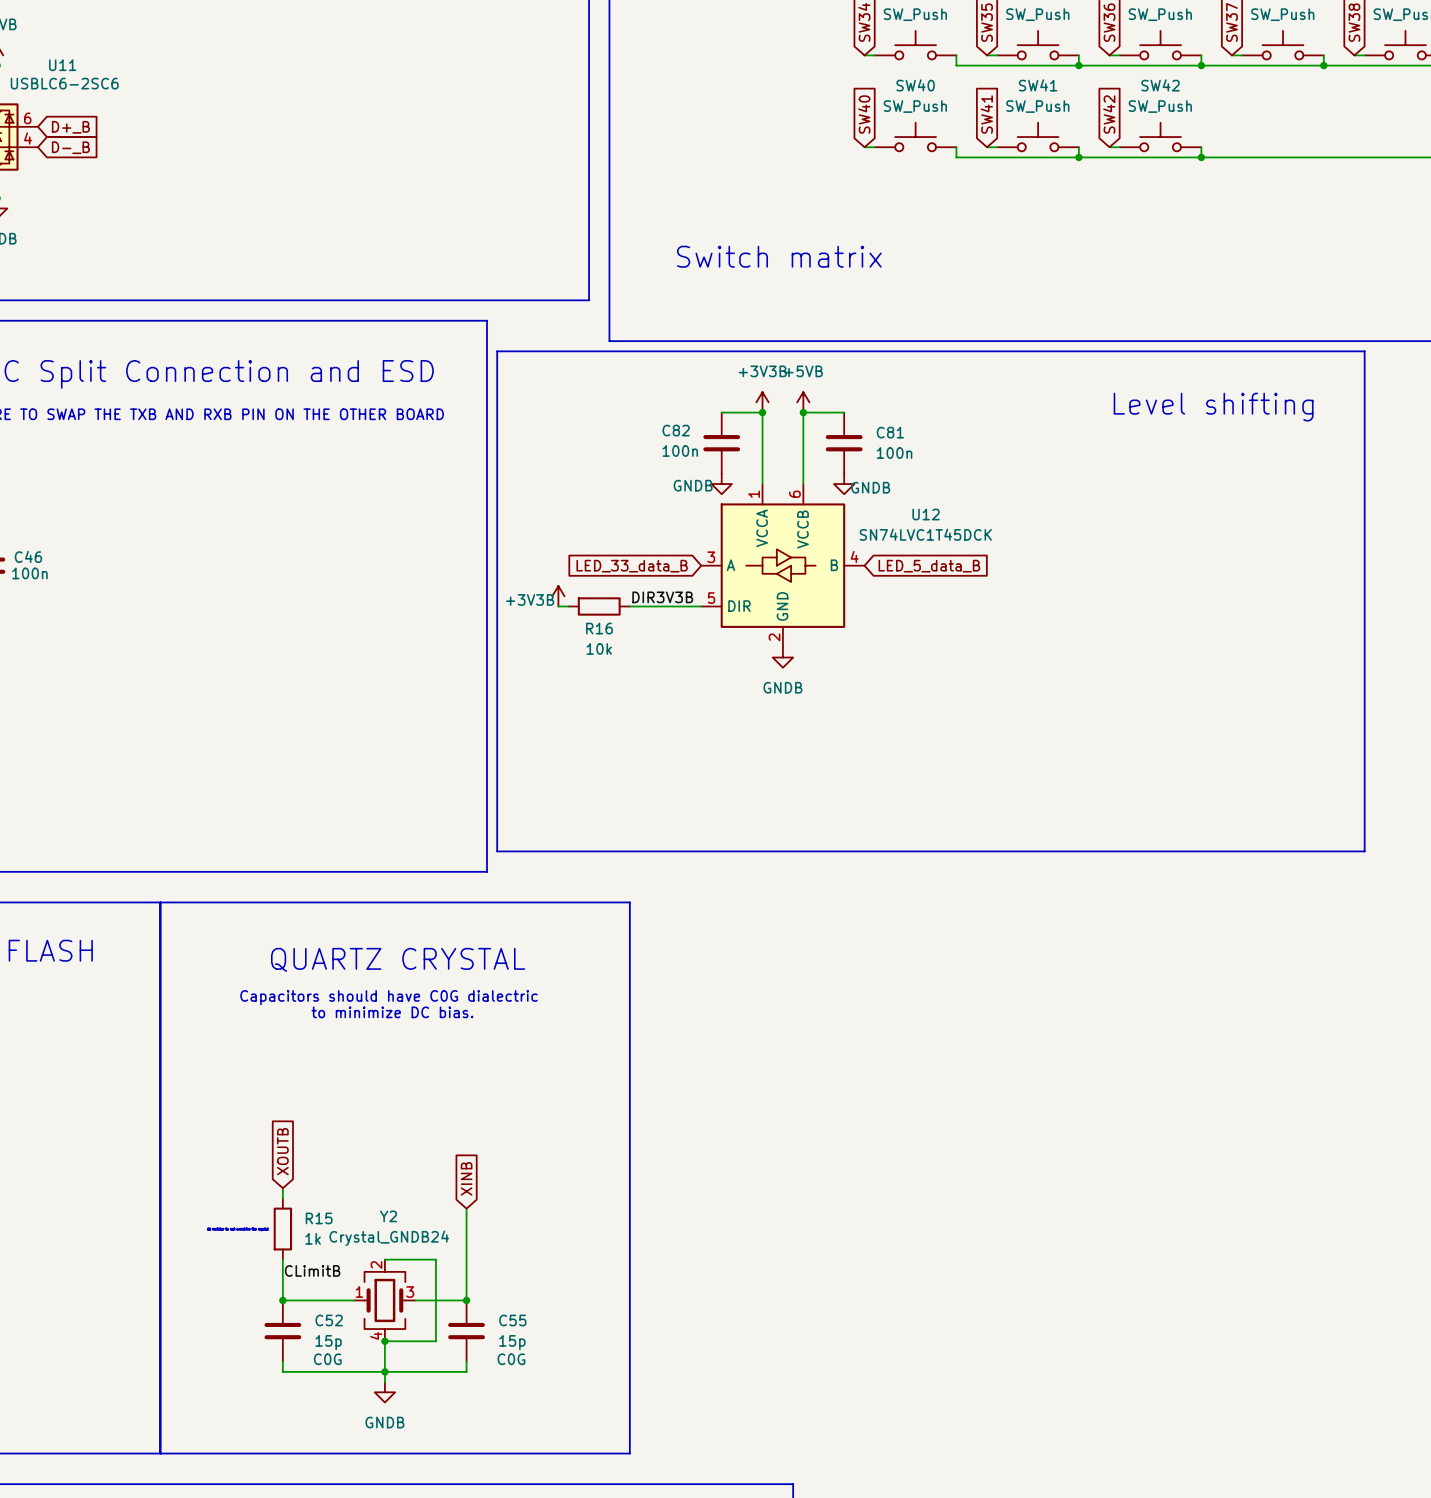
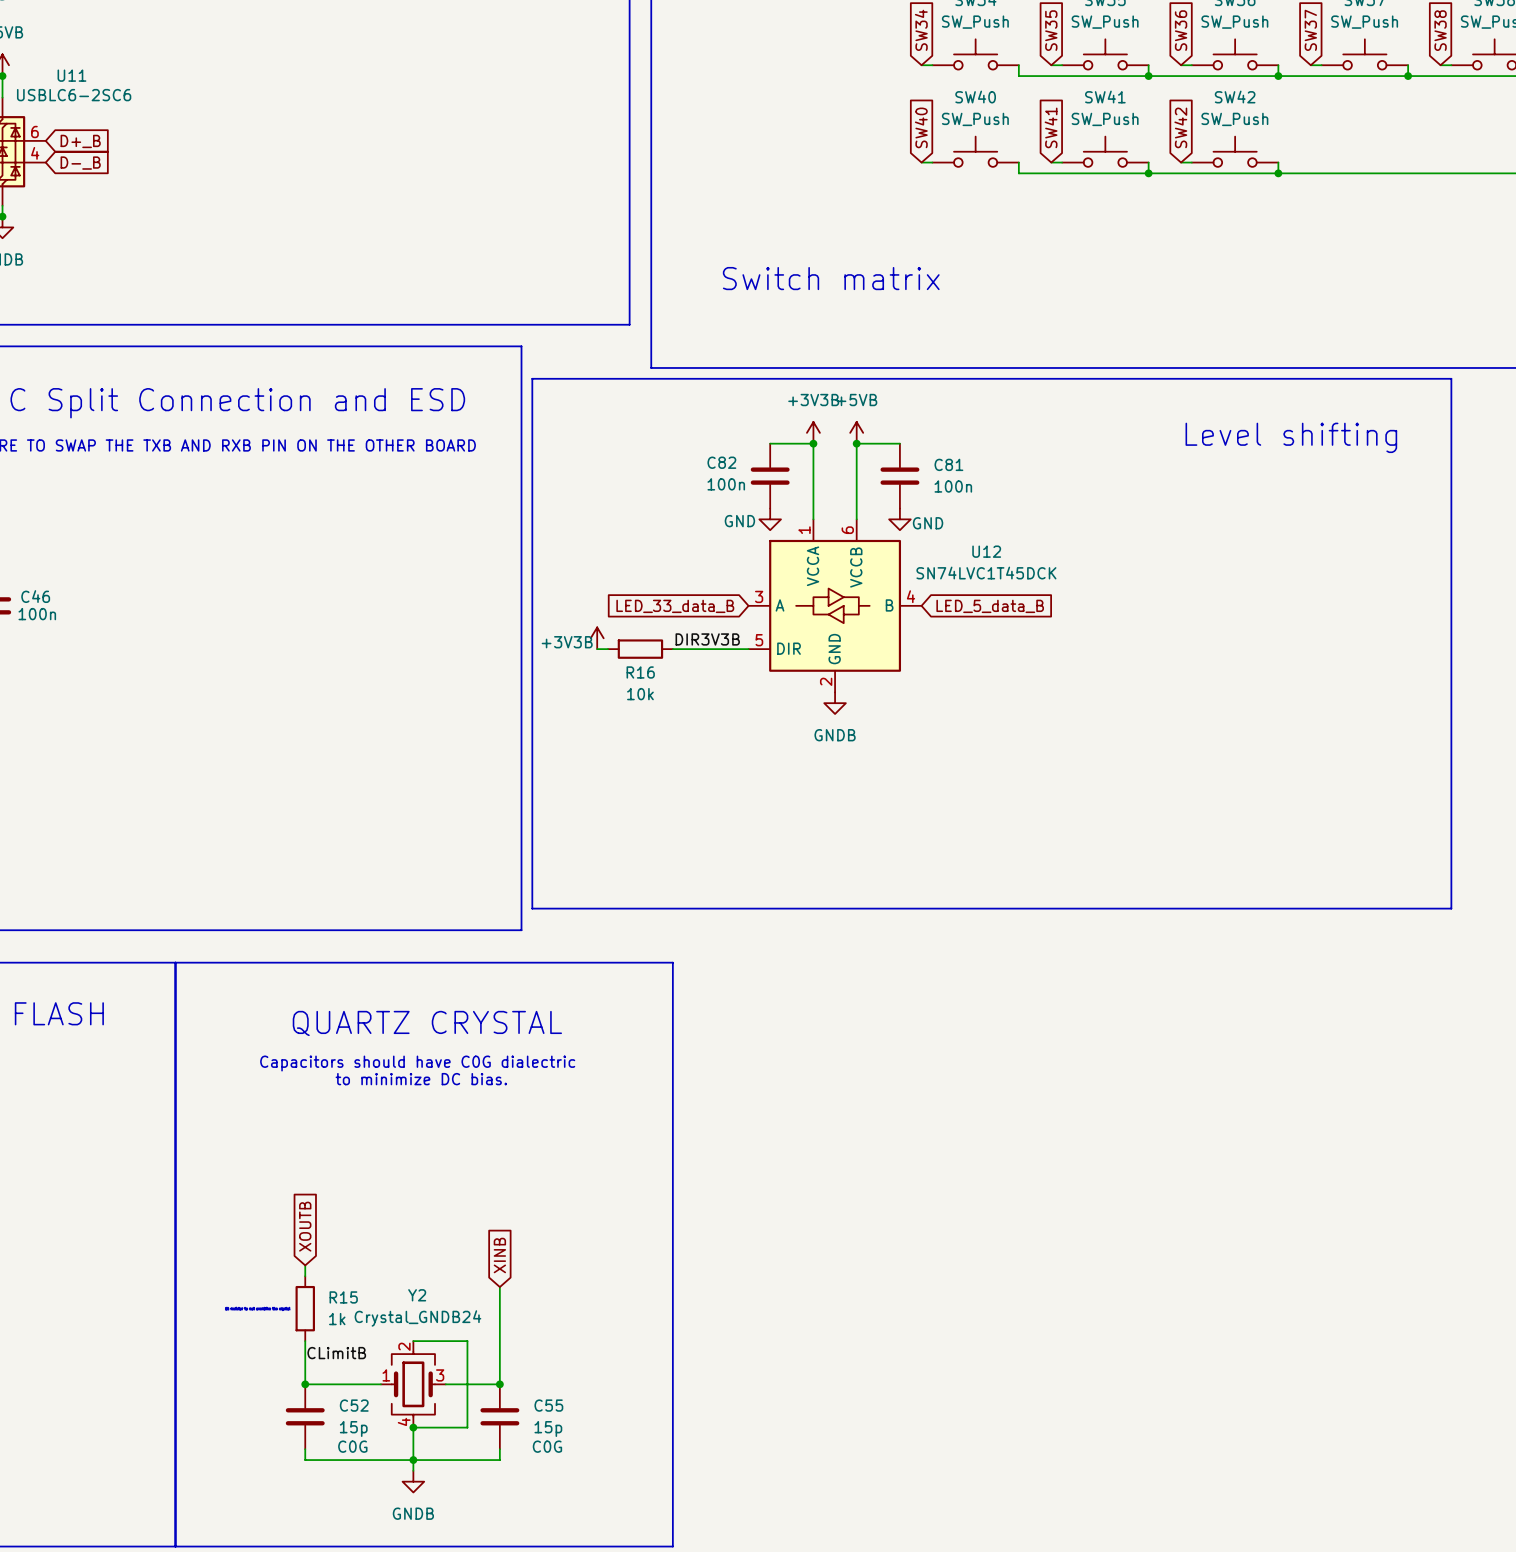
power symbol: GNDB (721, 484) -> GND (770, 519)
power symbol: GNDB (844, 484) -> GND (899, 519)

